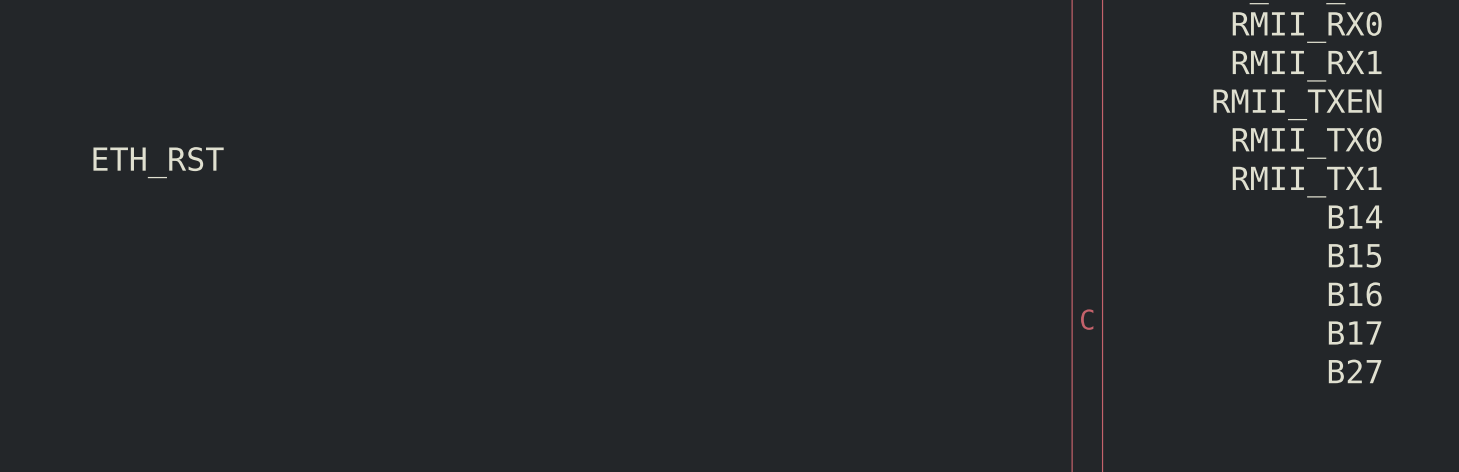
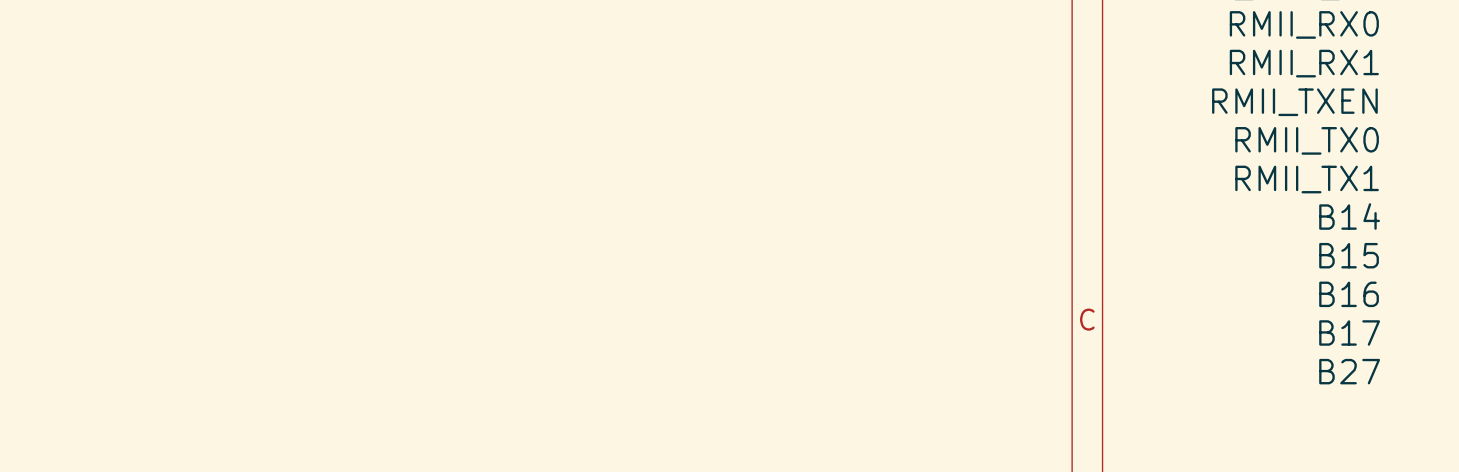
label: ETH_RST (158, 162) -> none

